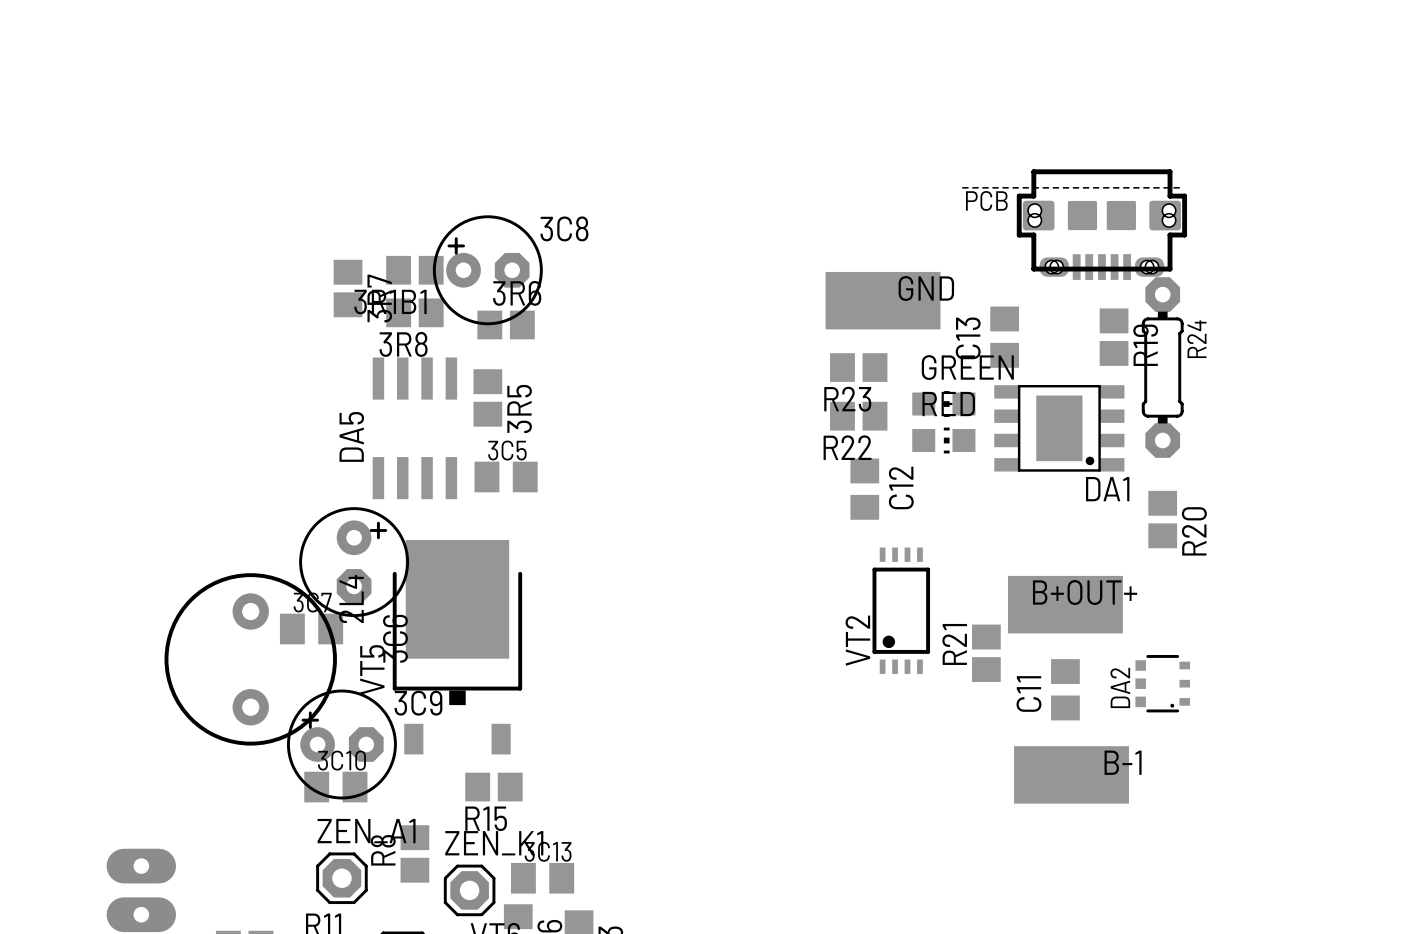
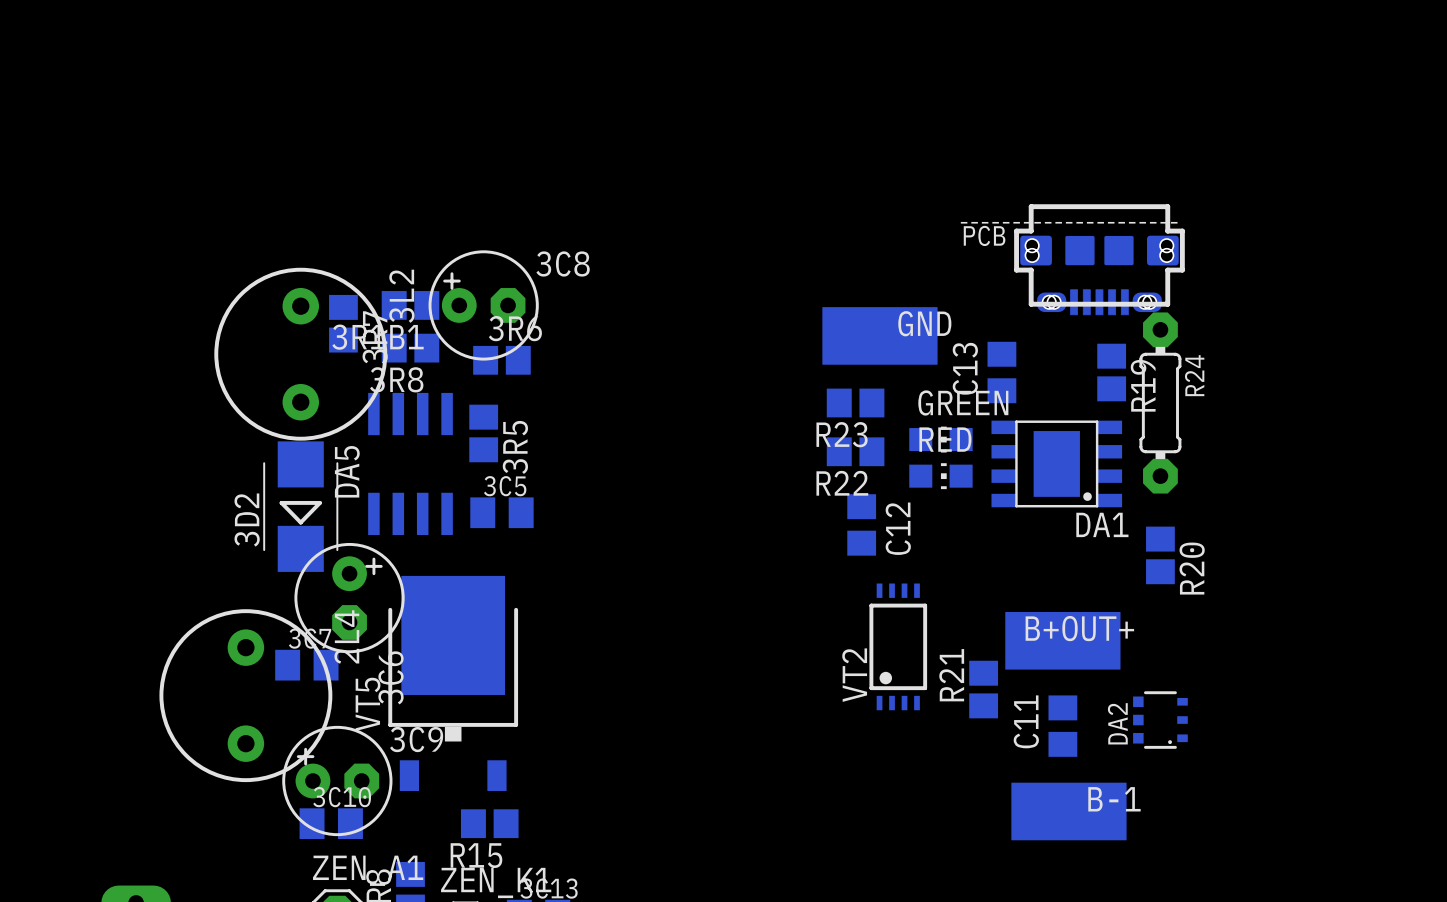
3L2: none -> (300, 354)
3D2: none -> (300, 506)

